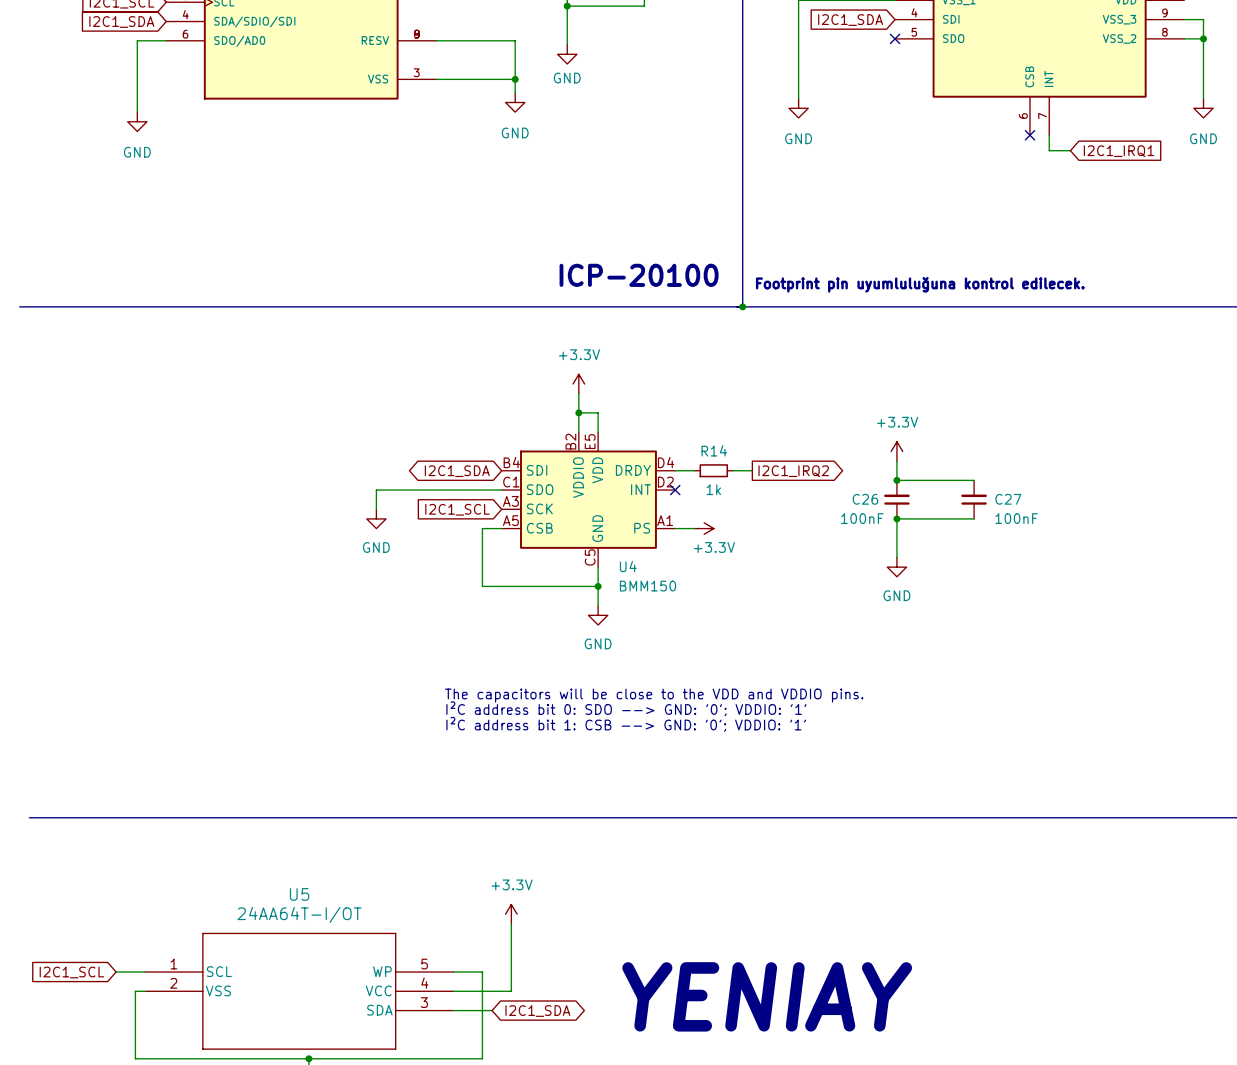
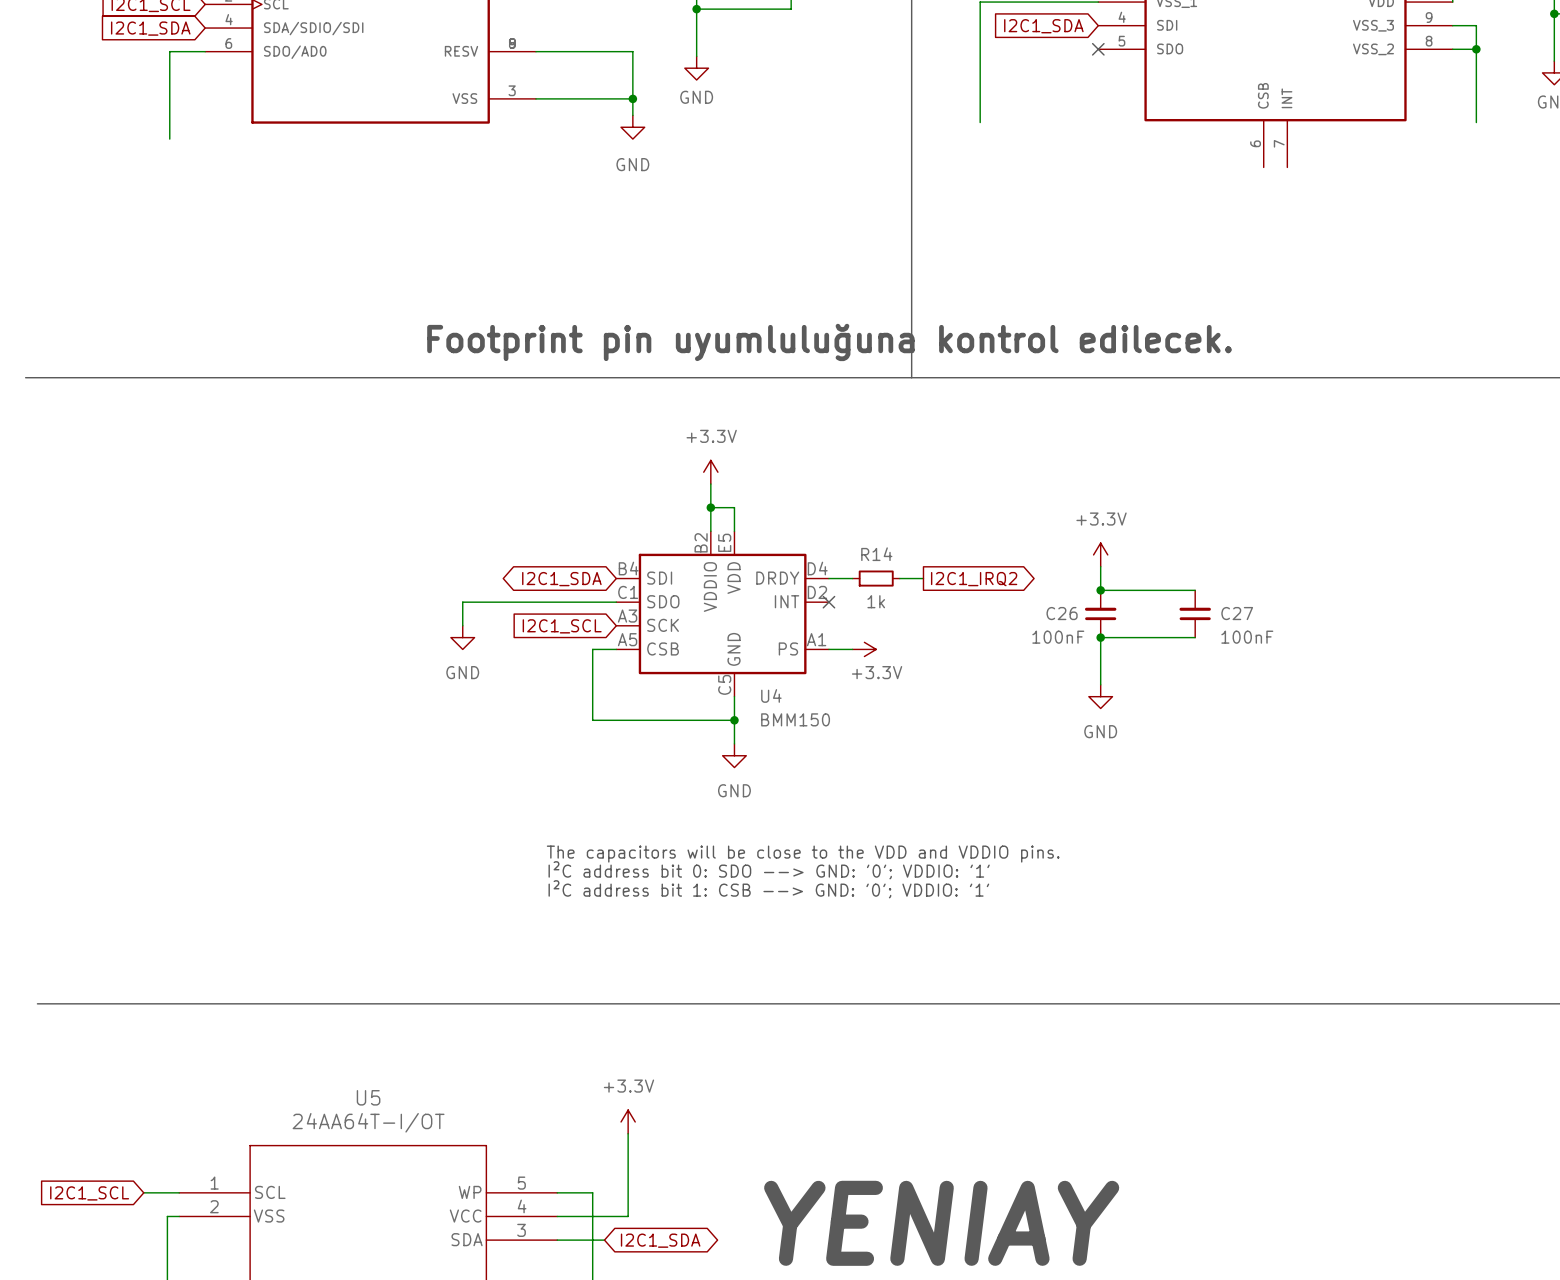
power symbol: GND (798, 108) -> none
power symbol: GND (1203, 108) -> none
power symbol: GND (137, 121) -> none
no-connect mark: (1029, 135) -> none
wire: (1049, 135) (1049, 150) (1070, 150) -> none
global label: I2C1_IRQ1 (1119, 151) -> none
text: ICP-20100 (639, 275) -> none
text: none -> Footprint pin uyumluluğuna kontrol edilecek. (829, 342)
text: Footprint pin uyumluluğuna kontrol edilecek. (920, 284) -> none
junction: (742, 306) -> none

